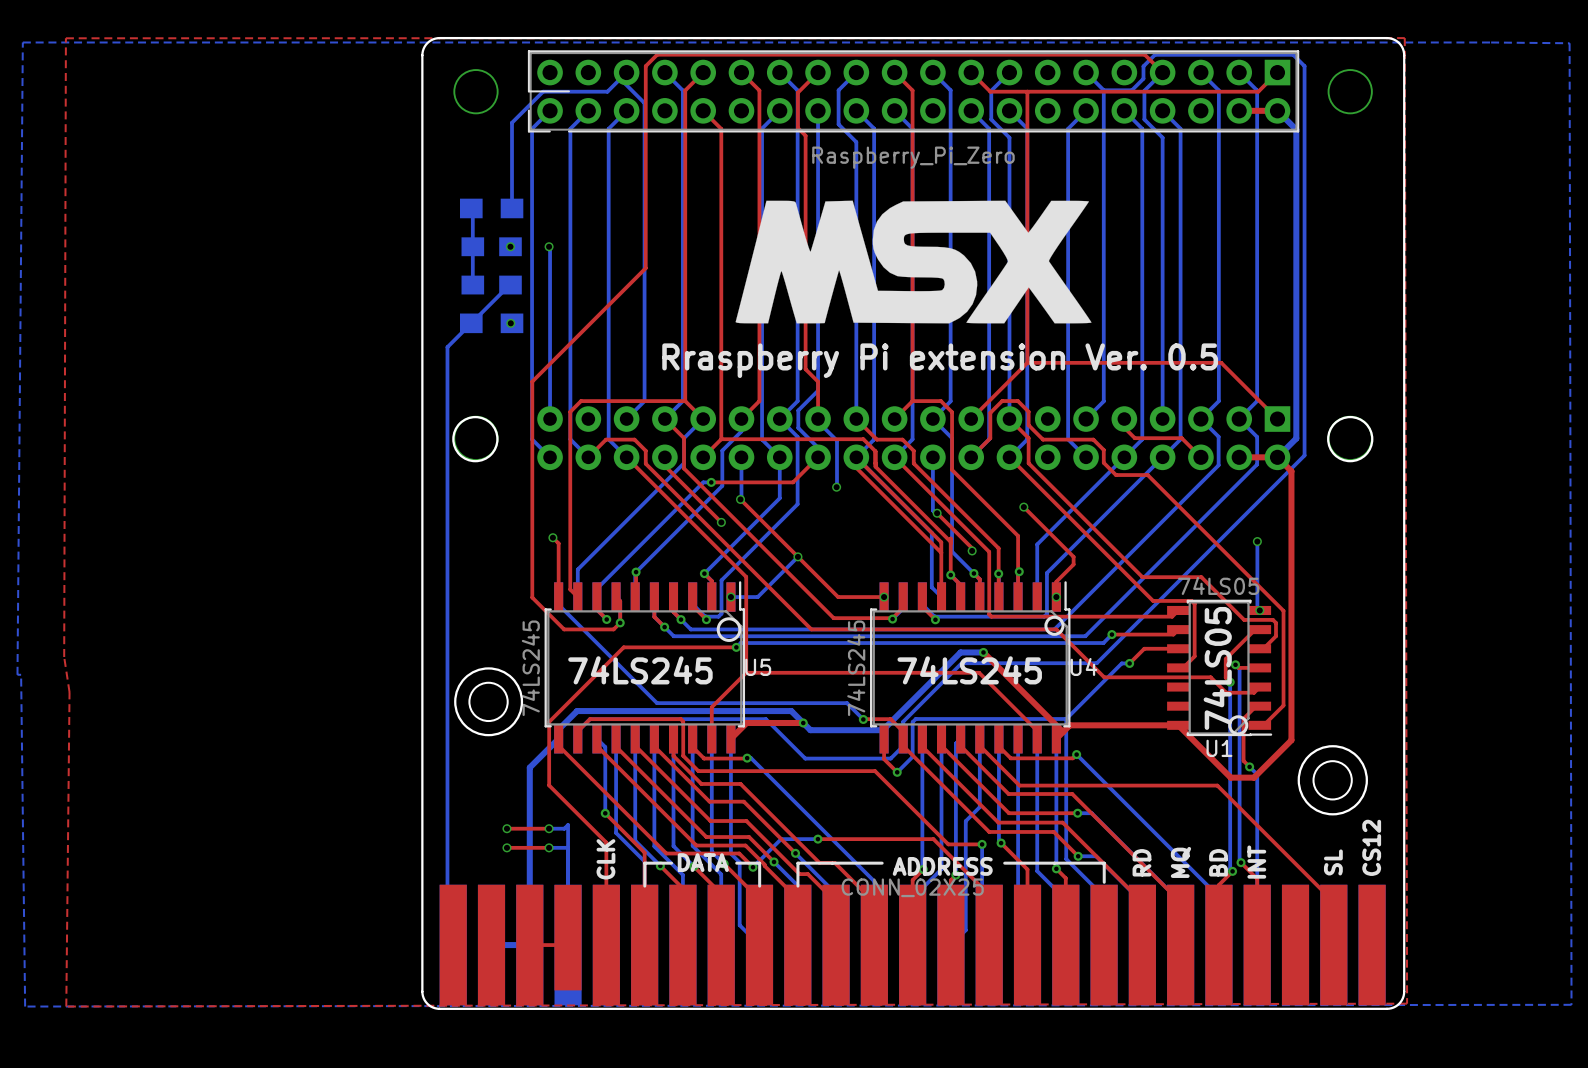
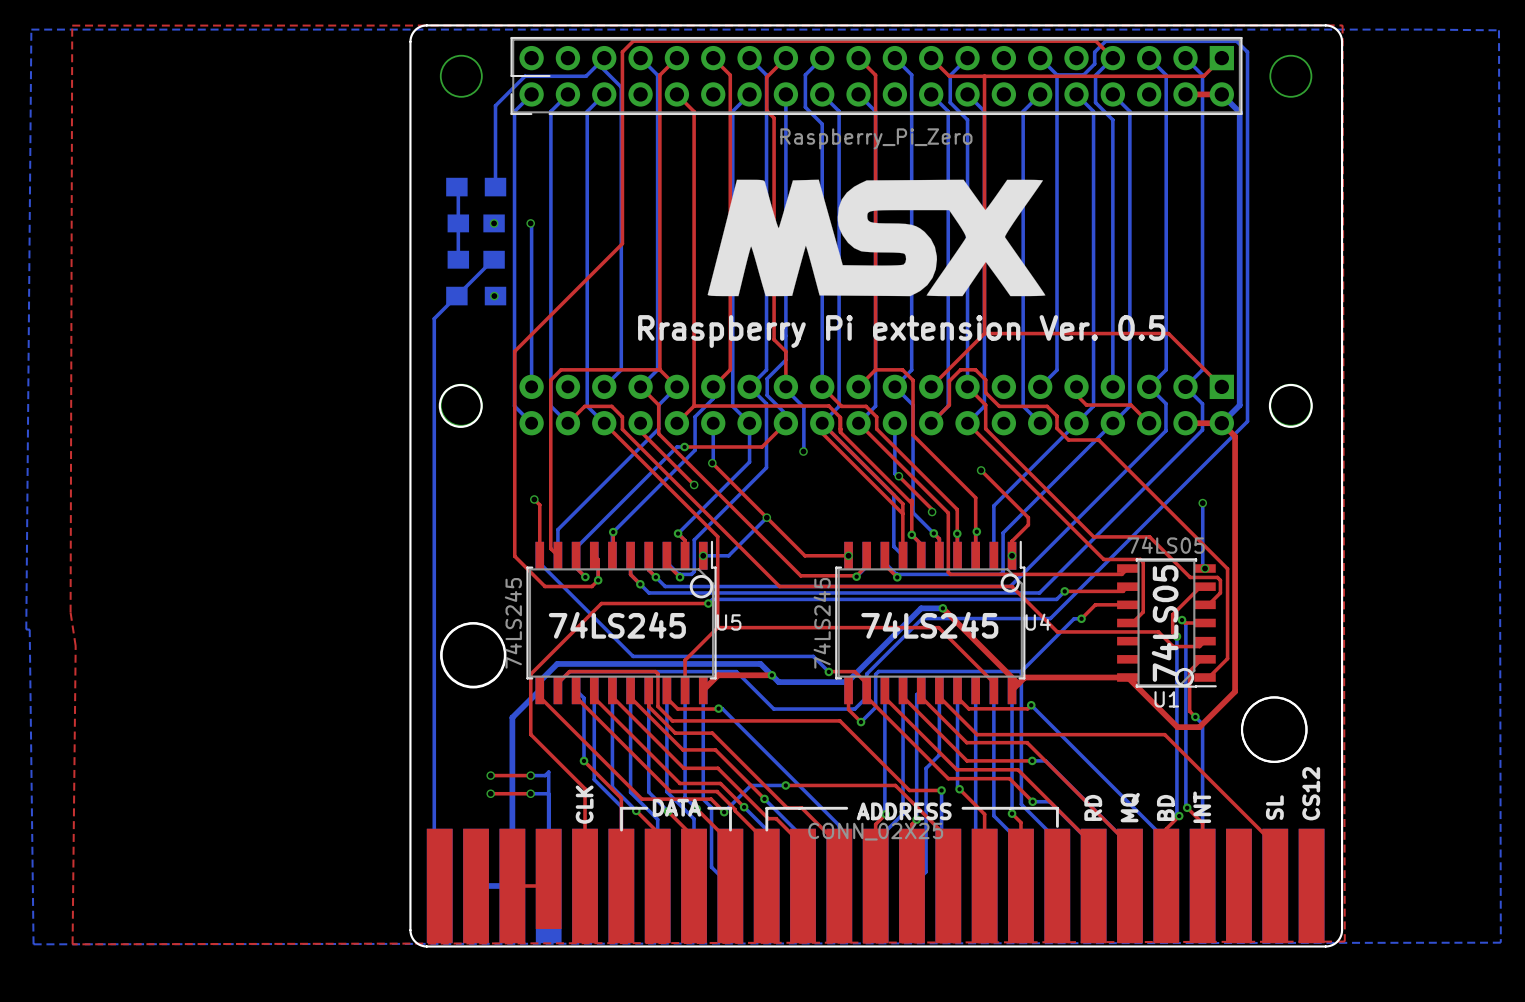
part footprint: [439, 682, 1386, 1006] -> [426, 623, 1325, 944]

